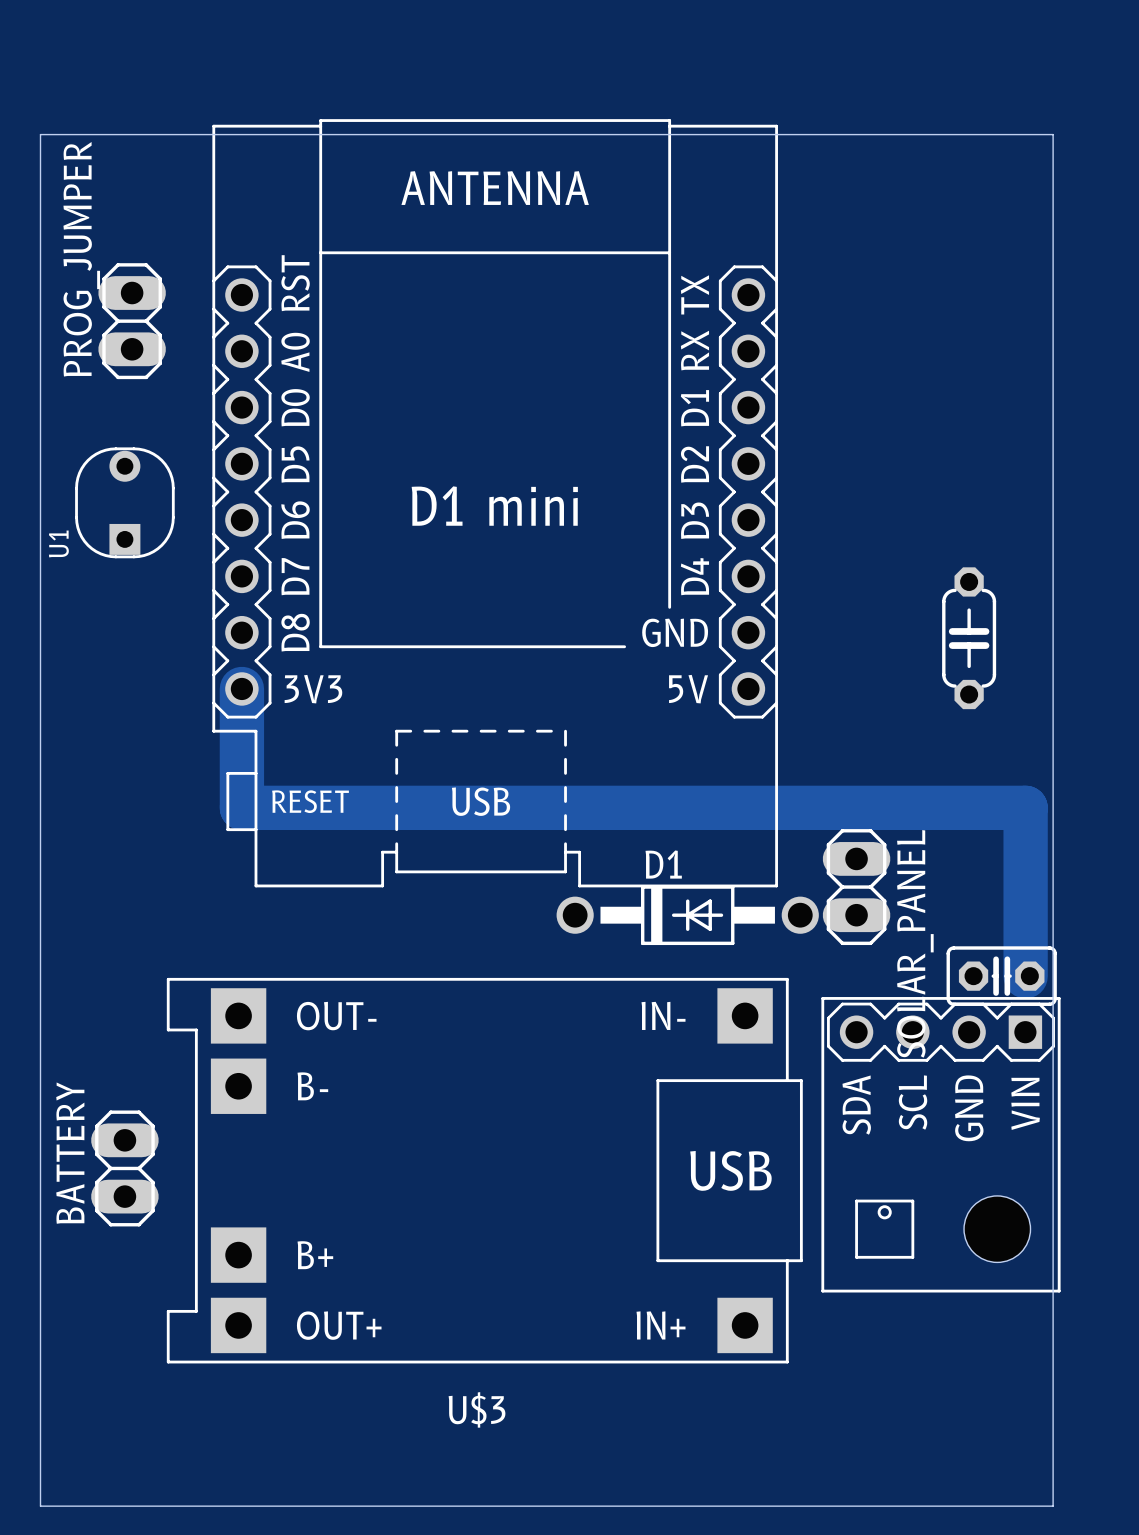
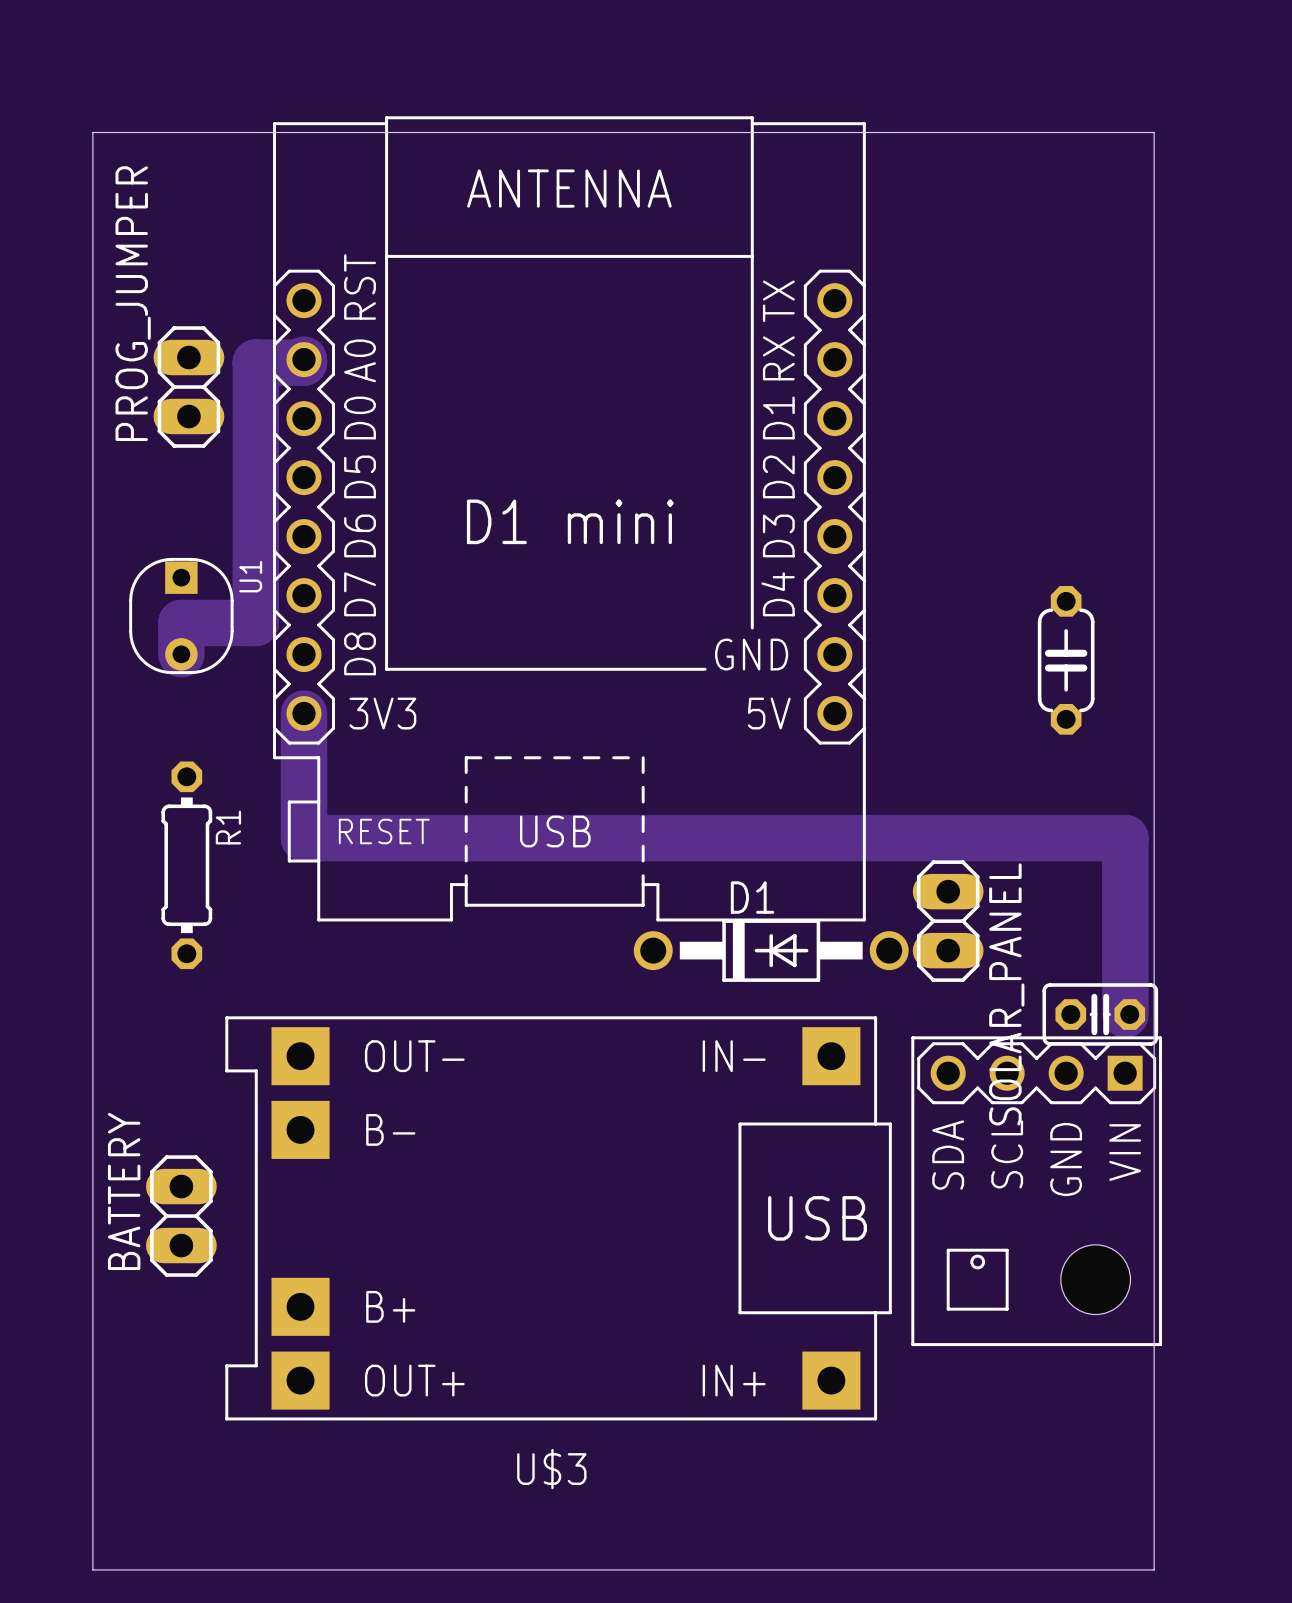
PROG_JUMPER position: (132, 321) -> (188, 387)
track: none -> (304, 359) (304, 362) (255, 362) (255, 623) (181, 623) (181, 654)
U1 rotation: 0° (124, 502) -> 180° (181, 616)
U1 position: (124, 502) -> (181, 616)
R1: none -> (186, 865)

